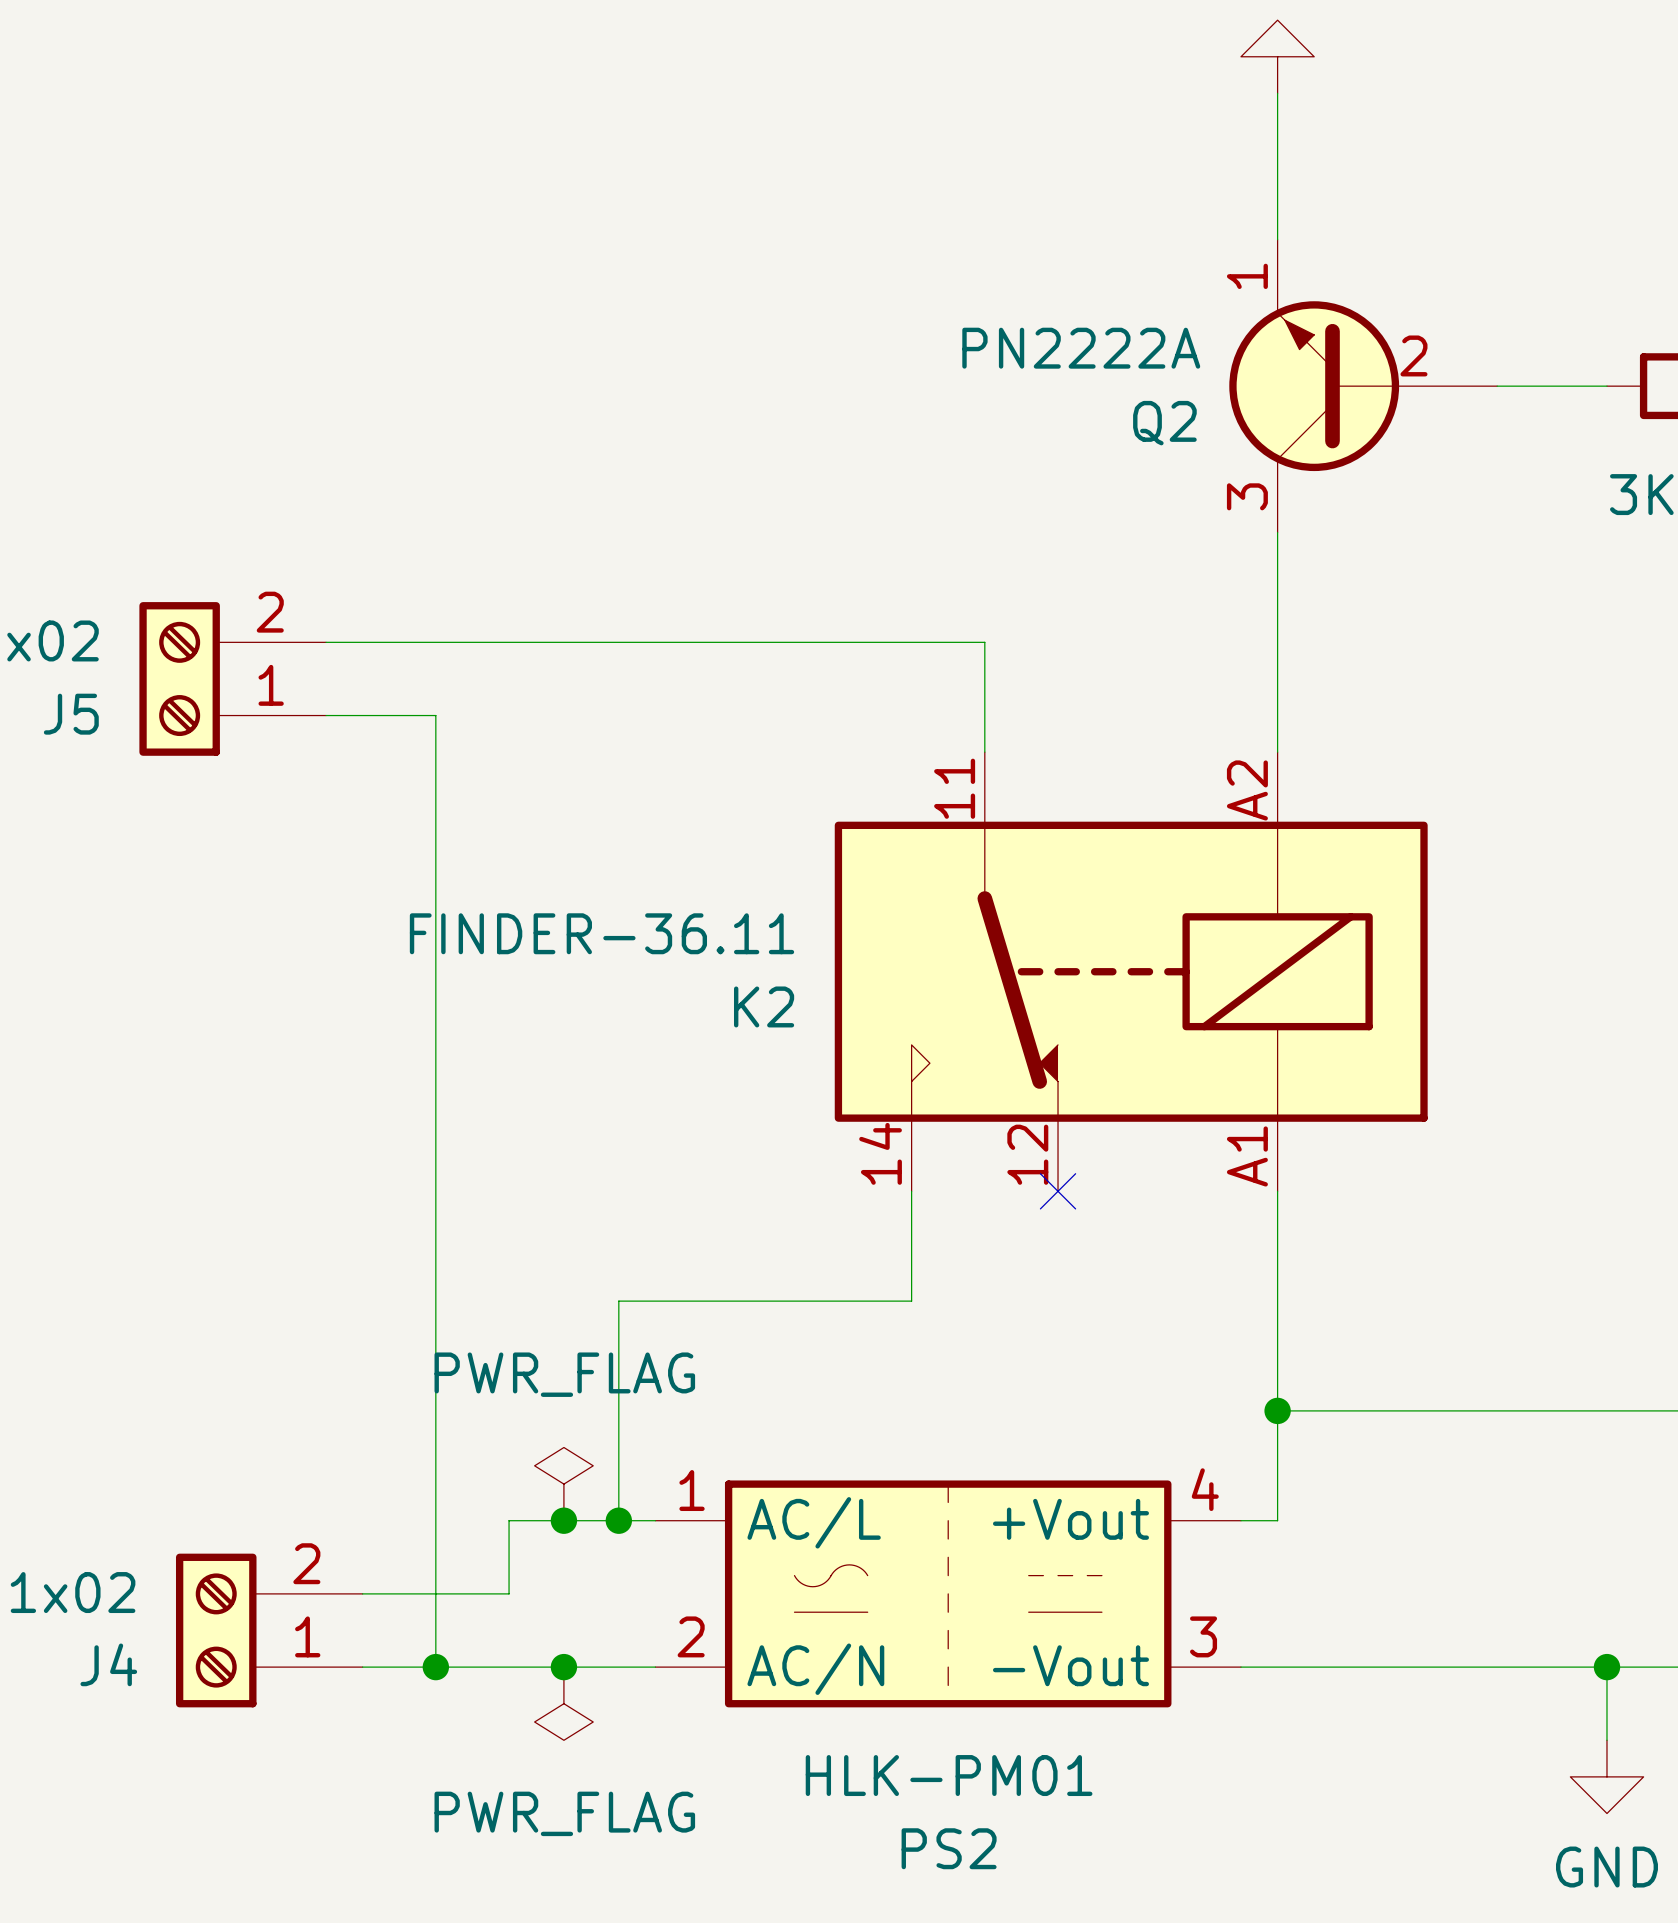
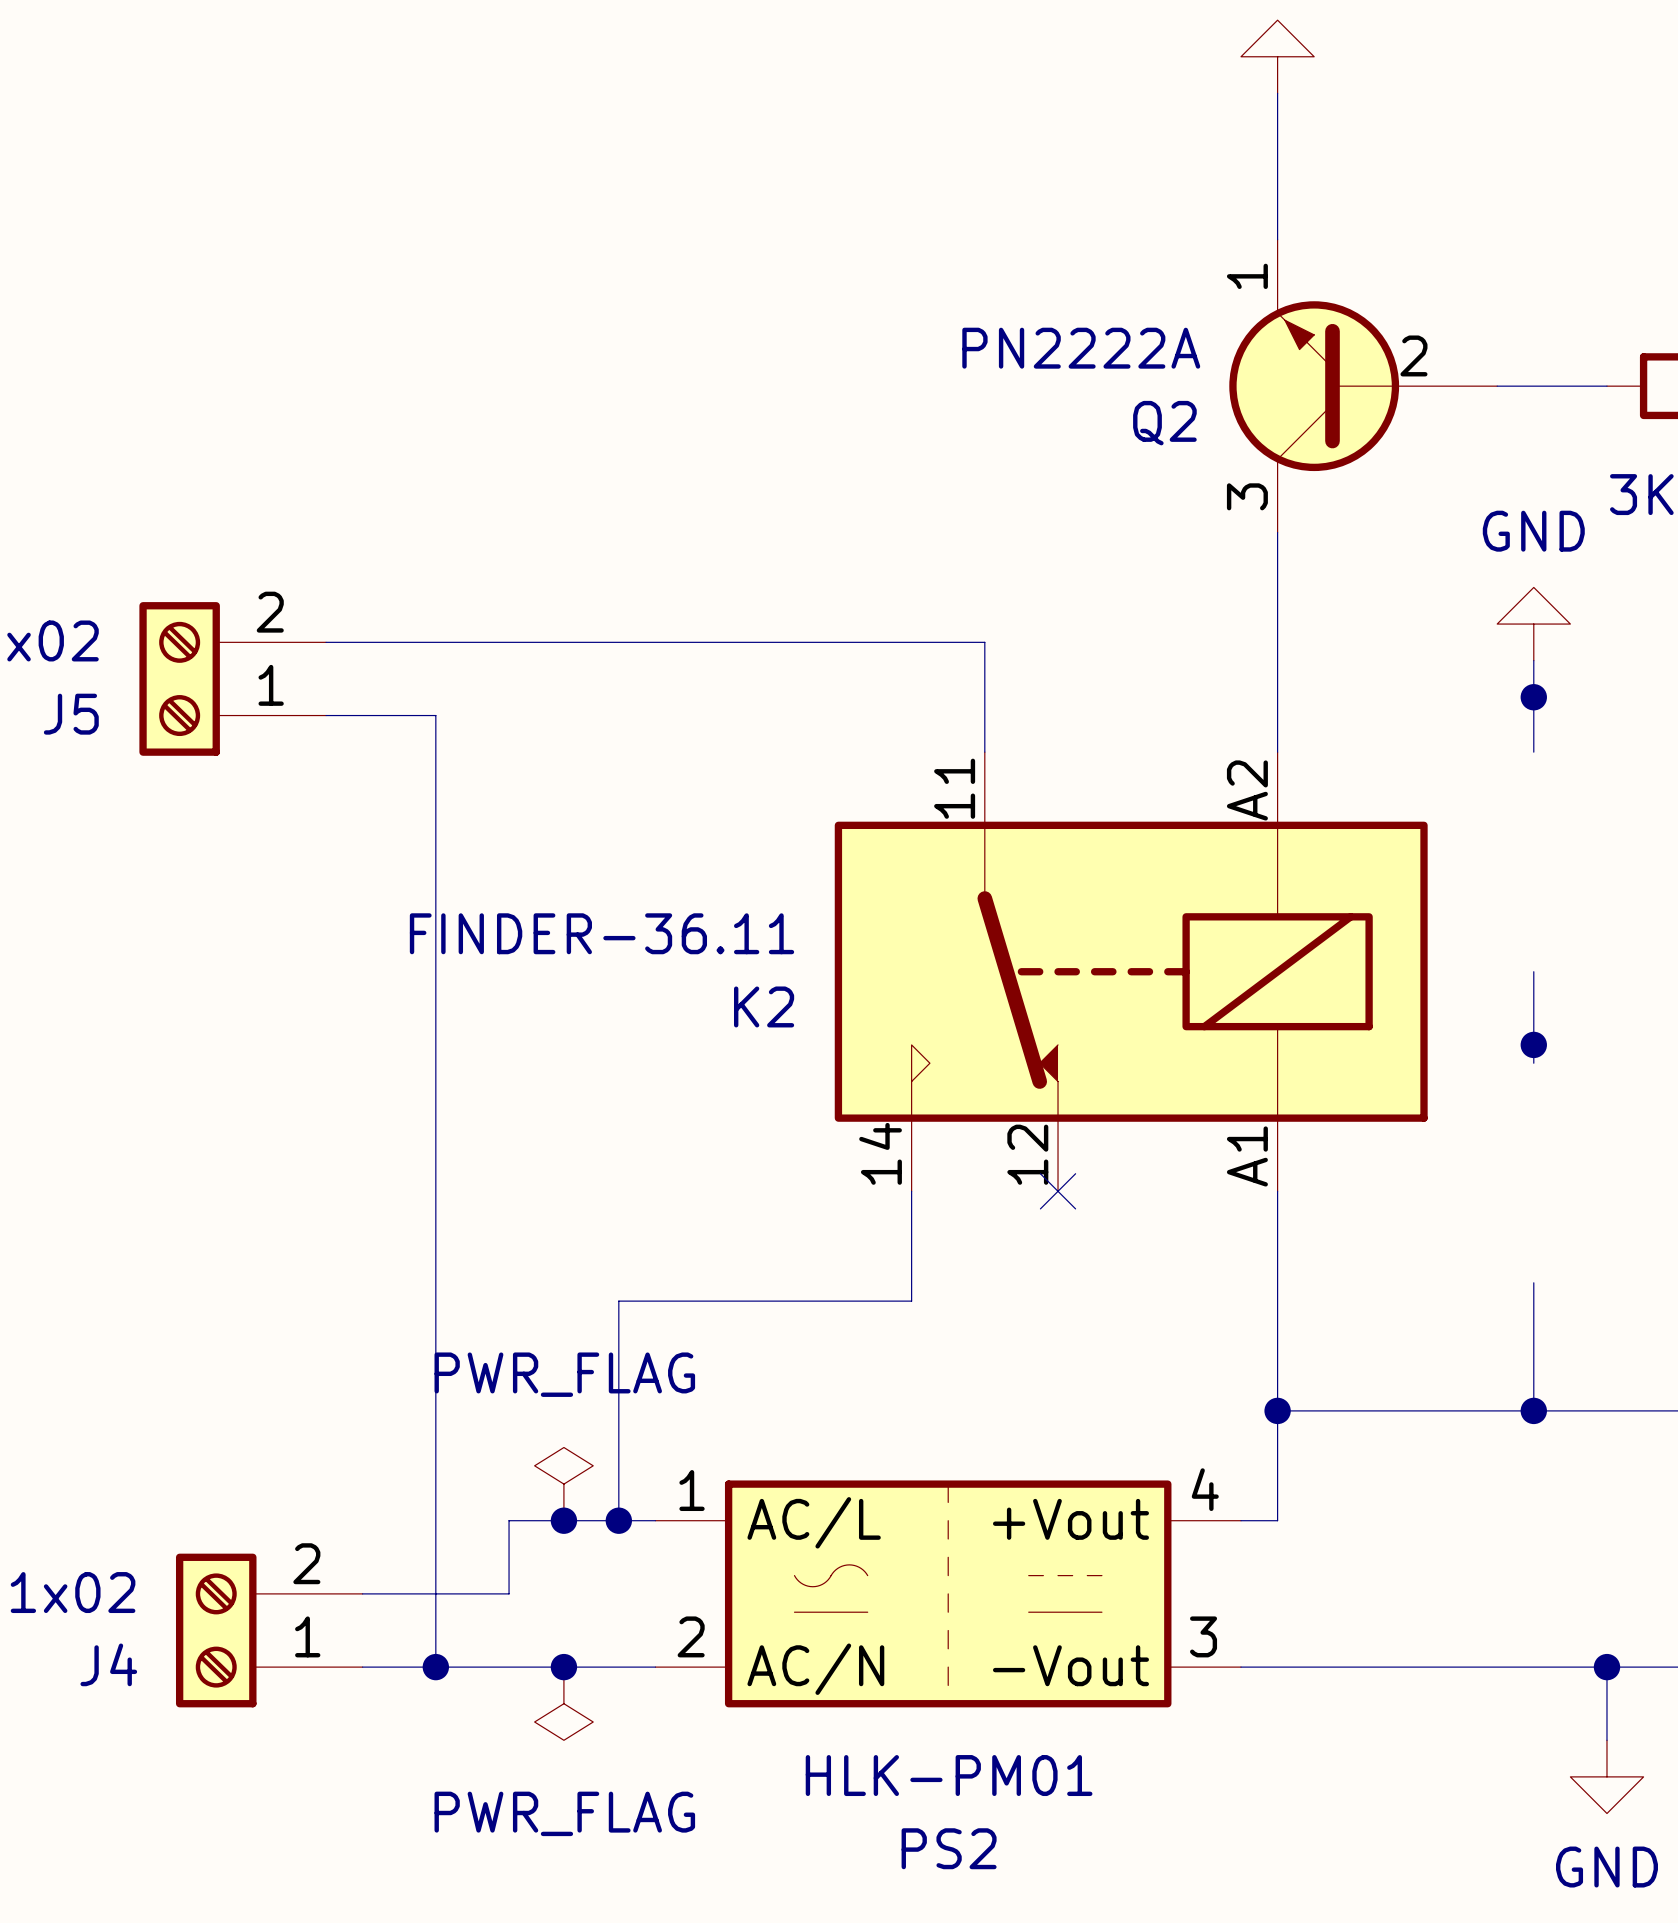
power symbol: none -> GND (1533, 624)
wire: none -> (1533, 660) (1533, 752)
junction: none -> (1533, 697)
wire: none -> (1533, 971) (1533, 1063)
junction: none -> (1533, 1044)
wire: none -> (1533, 1282) (1533, 1410)
junction: none -> (1533, 1410)

